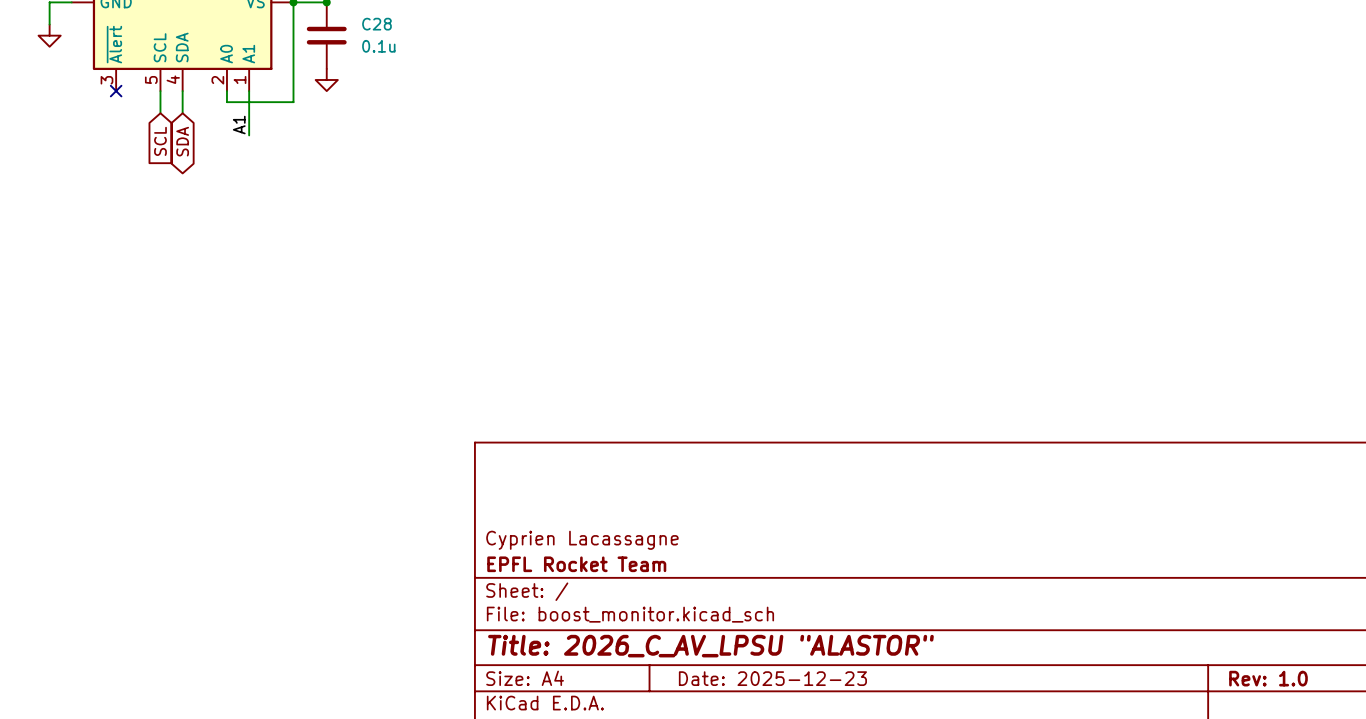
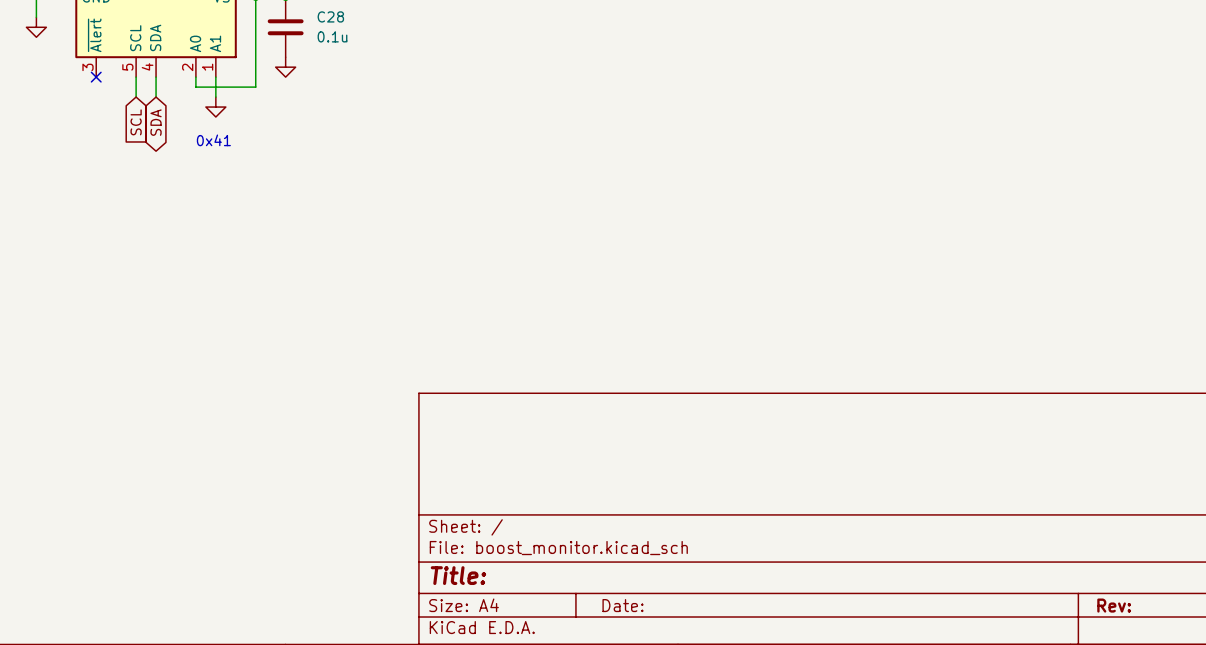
power symbol: none -> (215, 107)
label: A1 (239, 125) -> none
text: none -> 0x41 (213, 140)
title block: Cyprien Lacassagne (582, 540) -> none
title block: EPFL Rocket Team (576, 564) -> none
title block: Title: 2026_C_AV_LPSU "ALASTOR" (710, 646) -> Title: (458, 575)
title block: Date: 2025-12-23 (772, 678) -> Date: (623, 605)
title block: Rev: 1.0 (1268, 678) -> Rev: (1114, 605)

